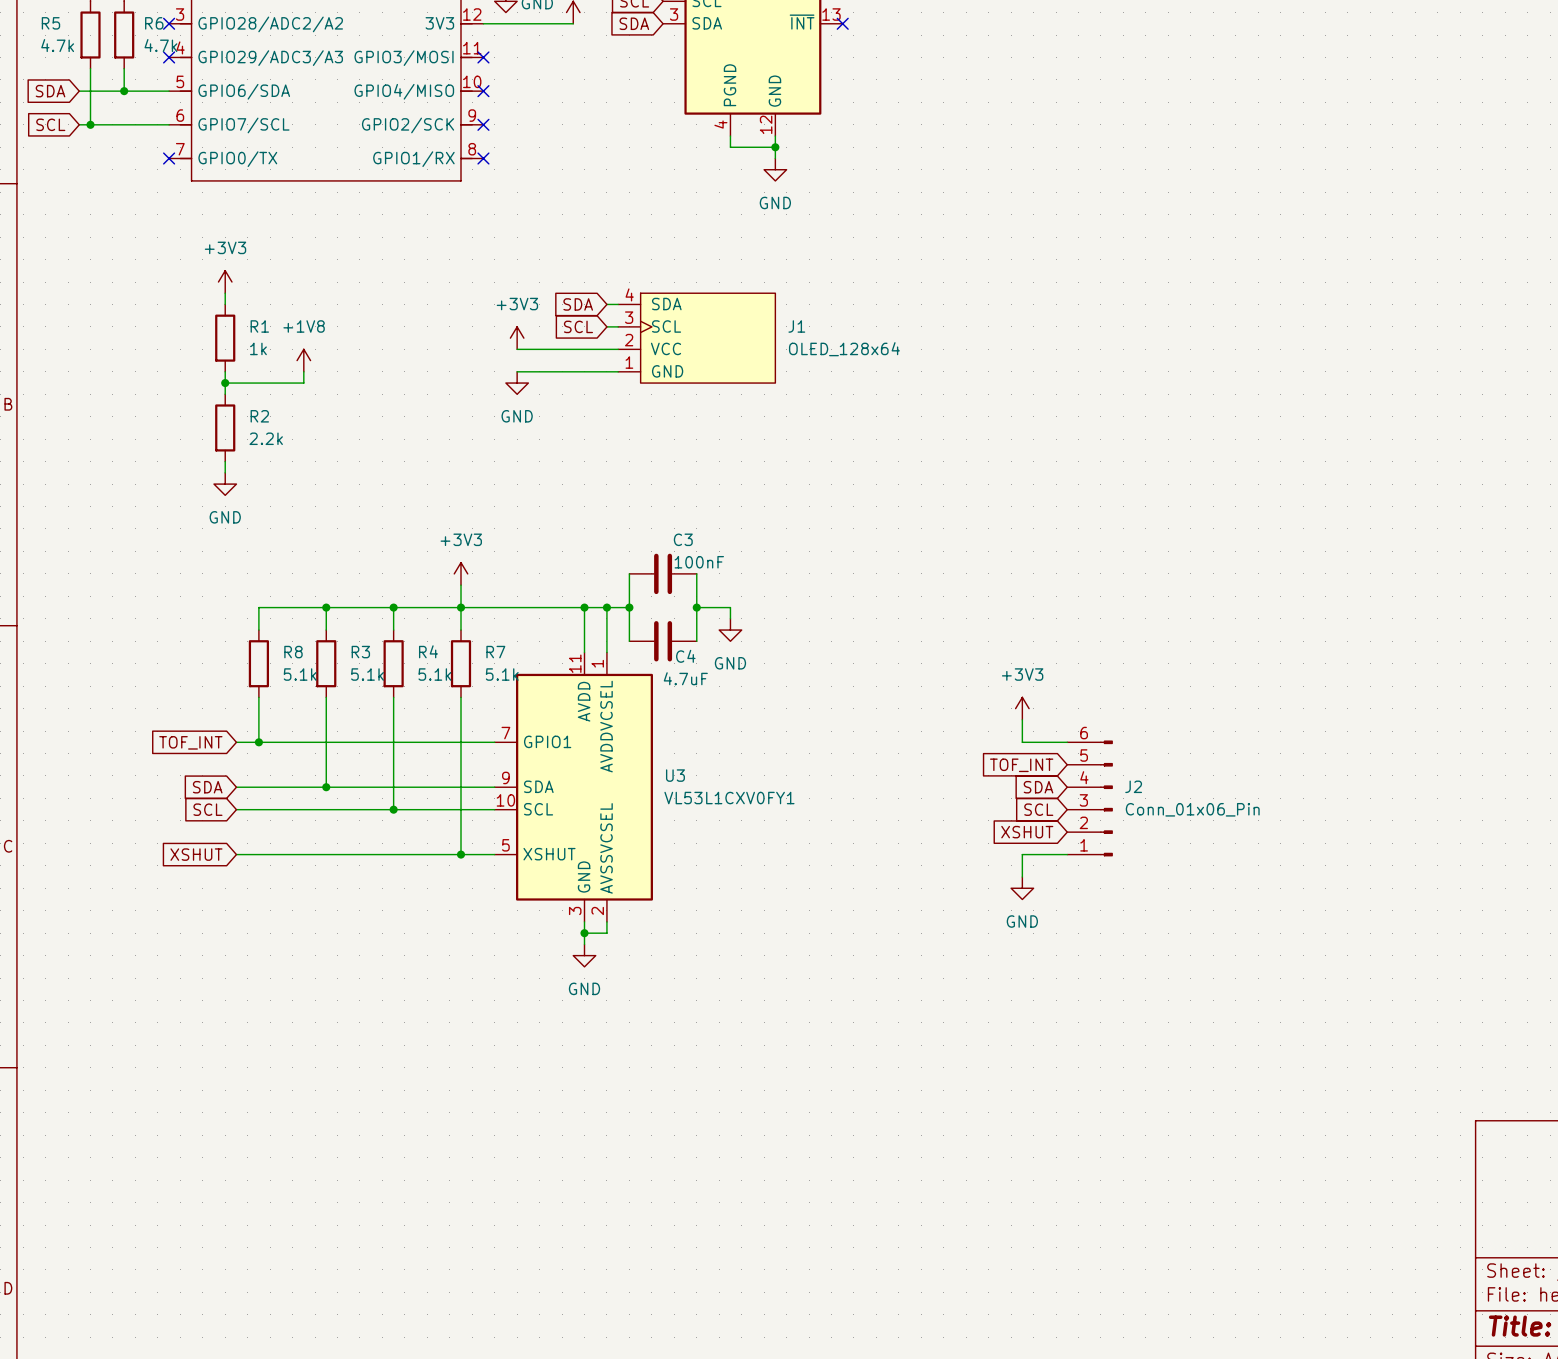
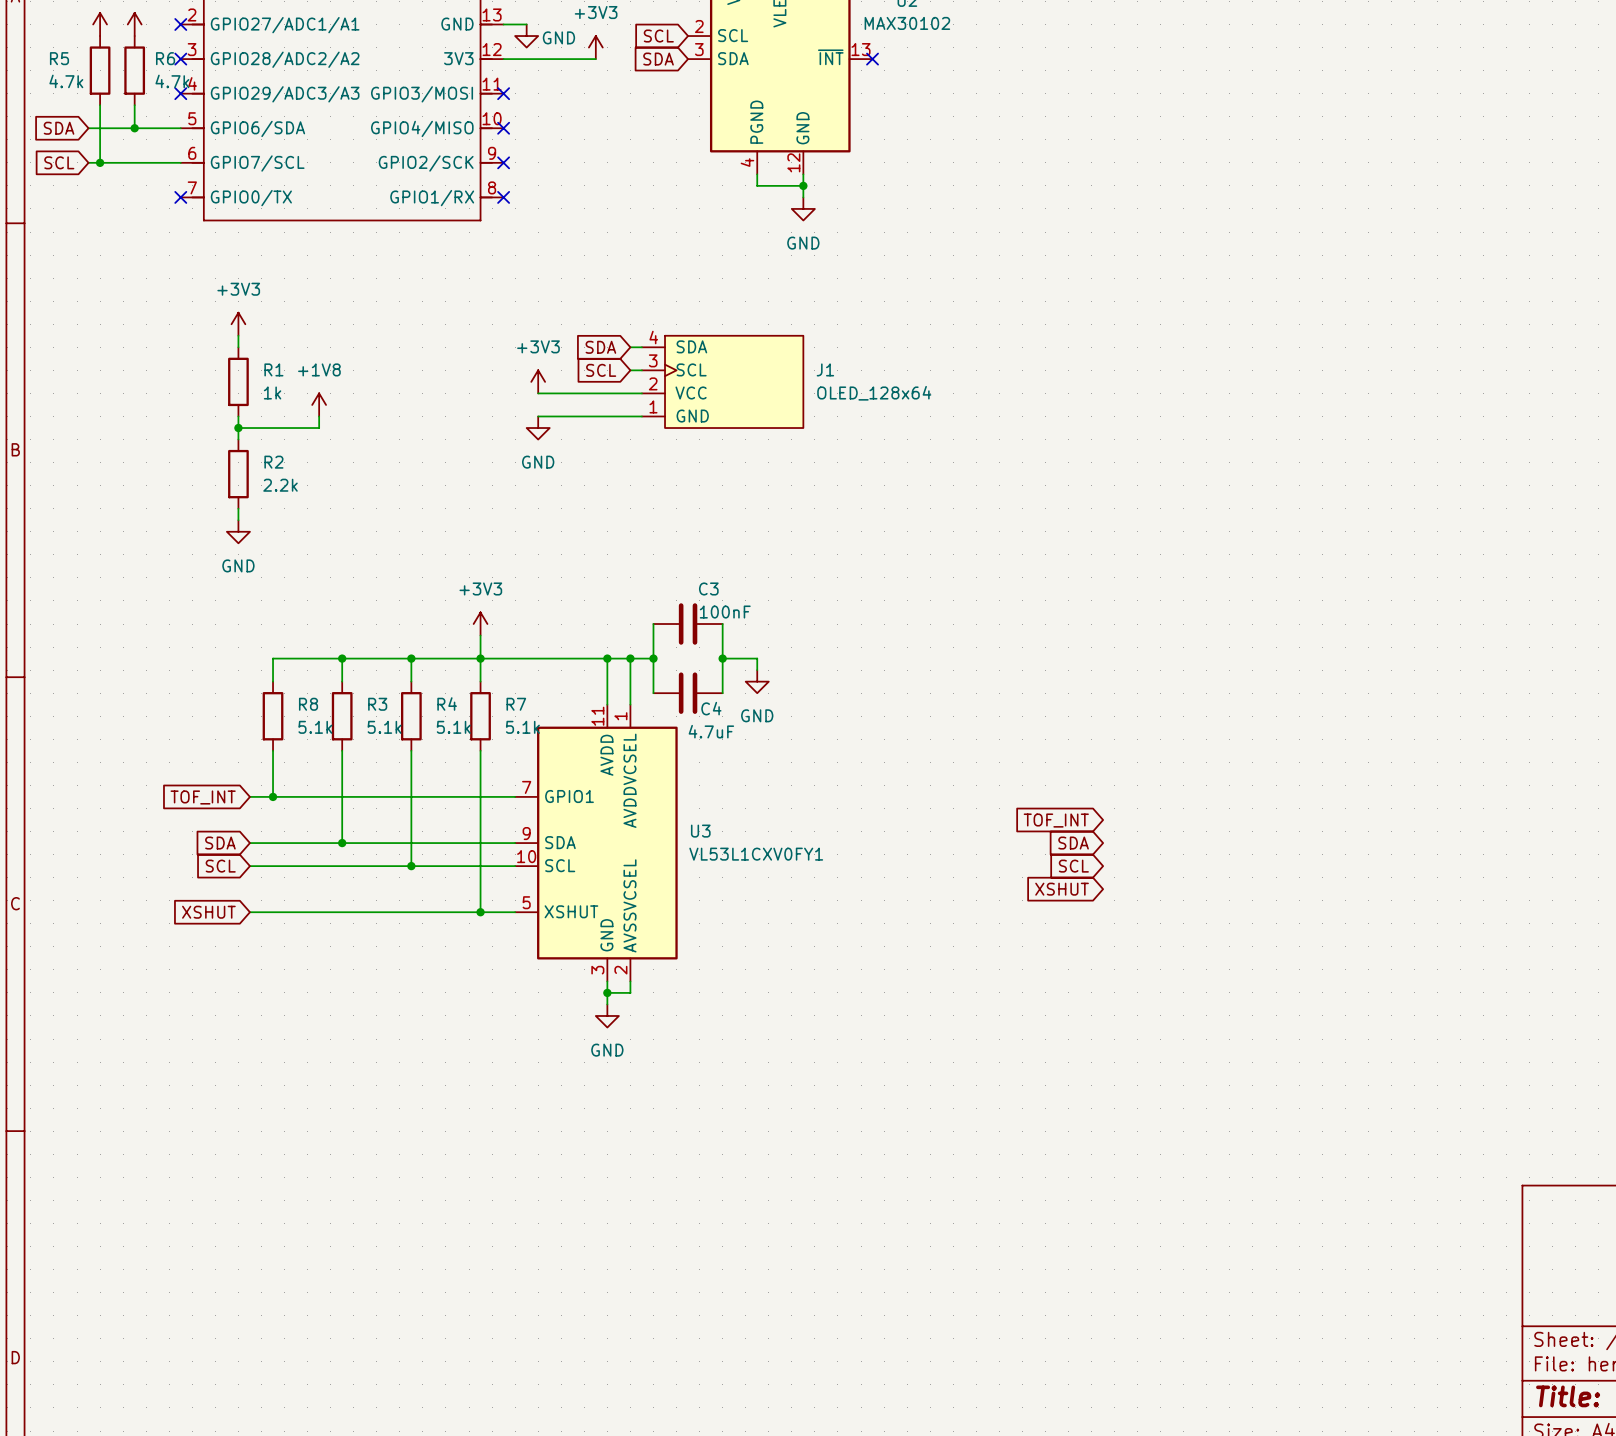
power symbol: +3V3 (1022, 708) -> none
wire: (1022, 719) (1022, 742) (1067, 742) -> none
J2: Conn_01x06_Pin (1090, 798) -> none
wire: (1067, 854) (1022, 854) (1022, 877) -> none
power symbol: GND (1022, 888) -> none

